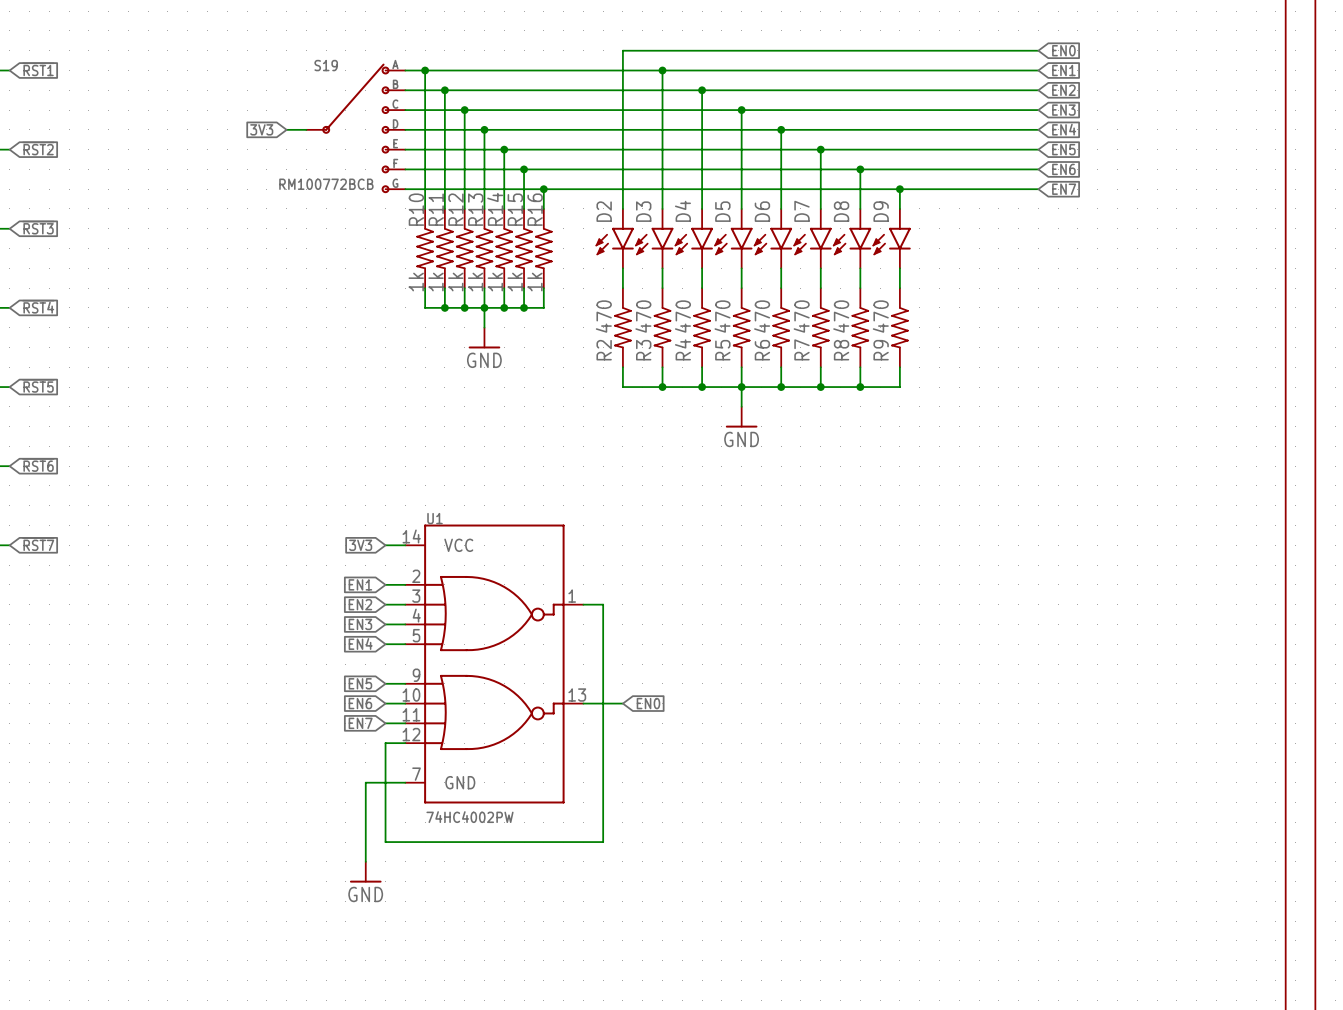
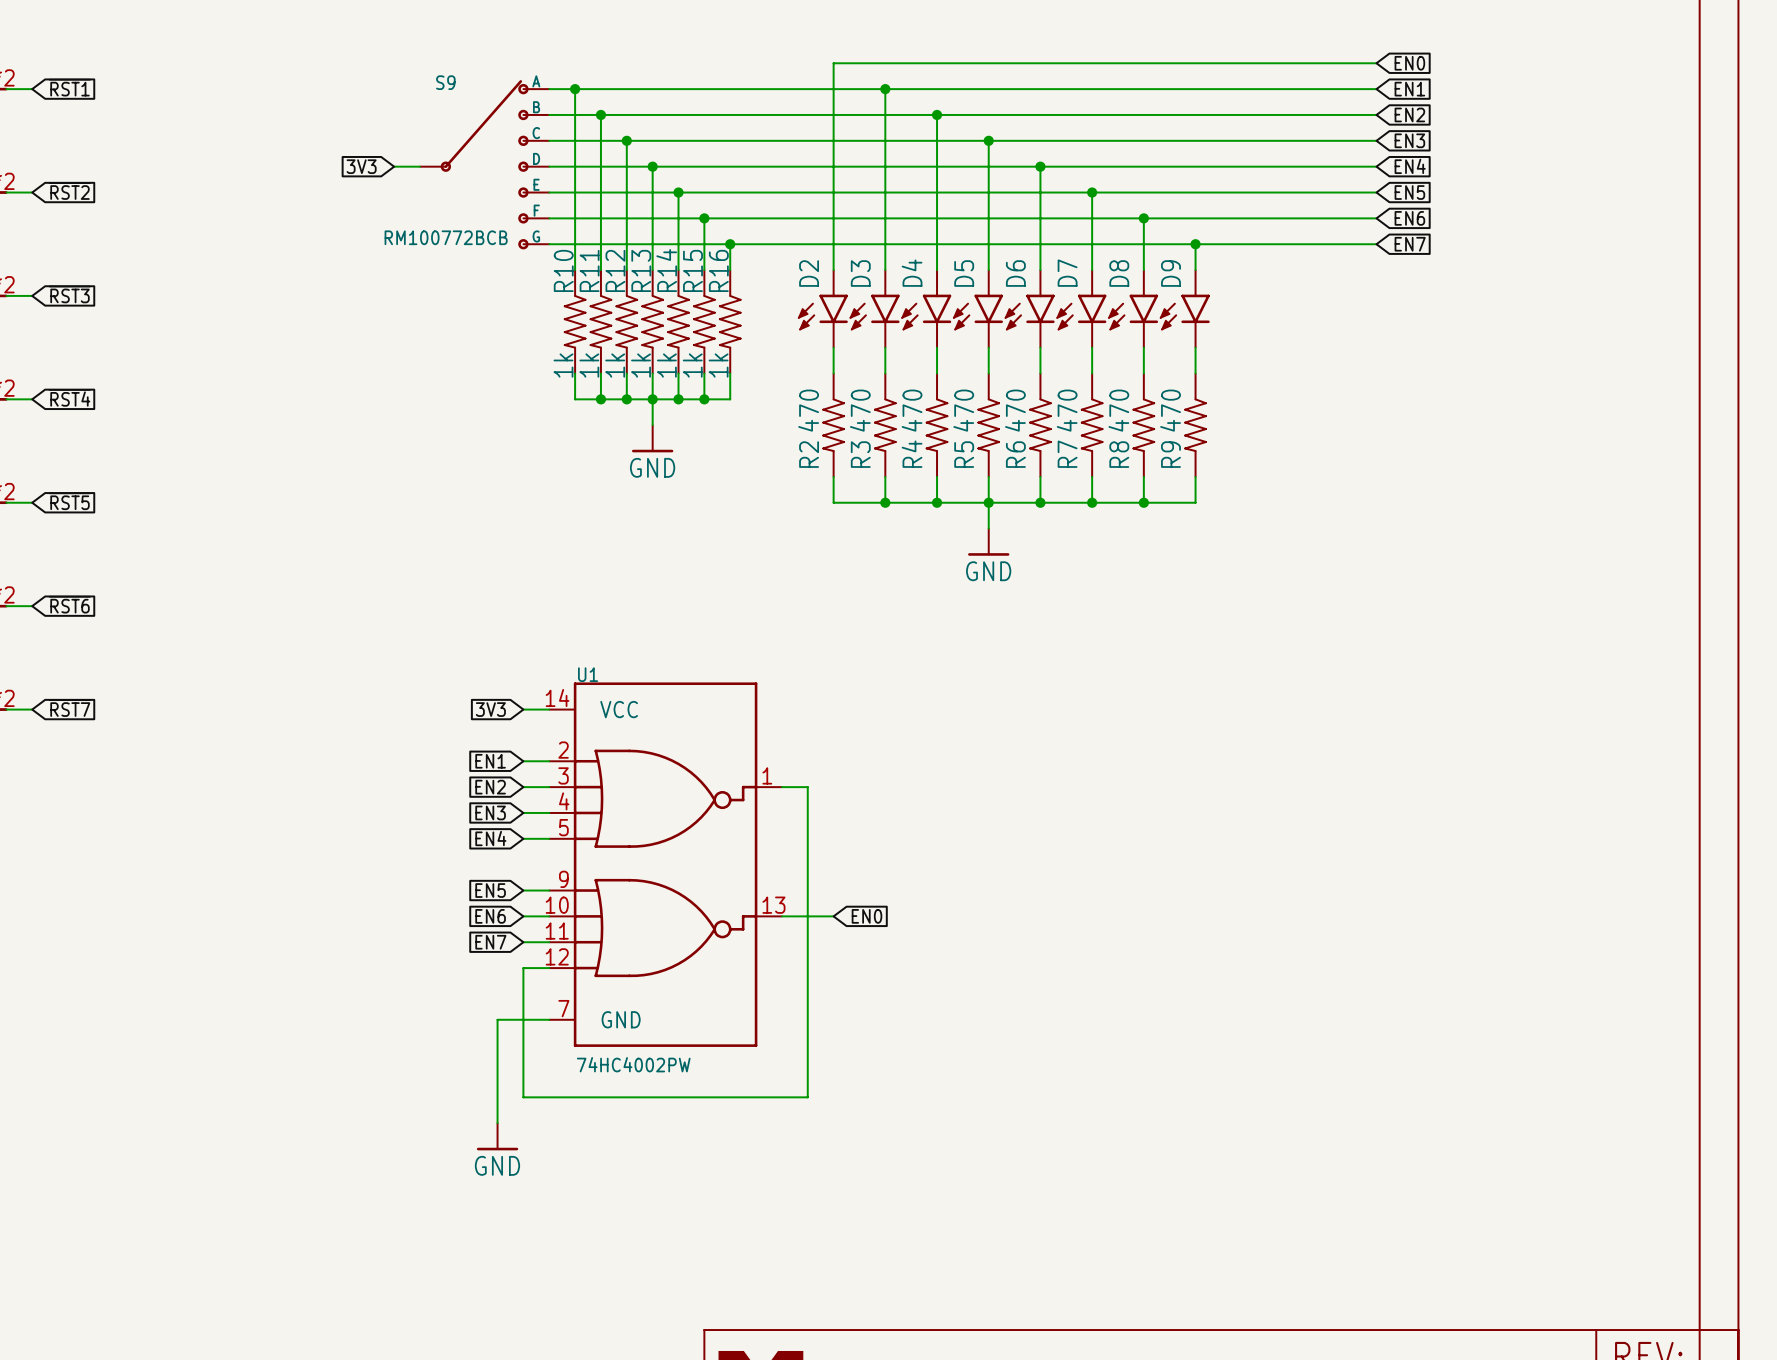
S19 name: S19 (326, 65) -> S9 (445, 82)

